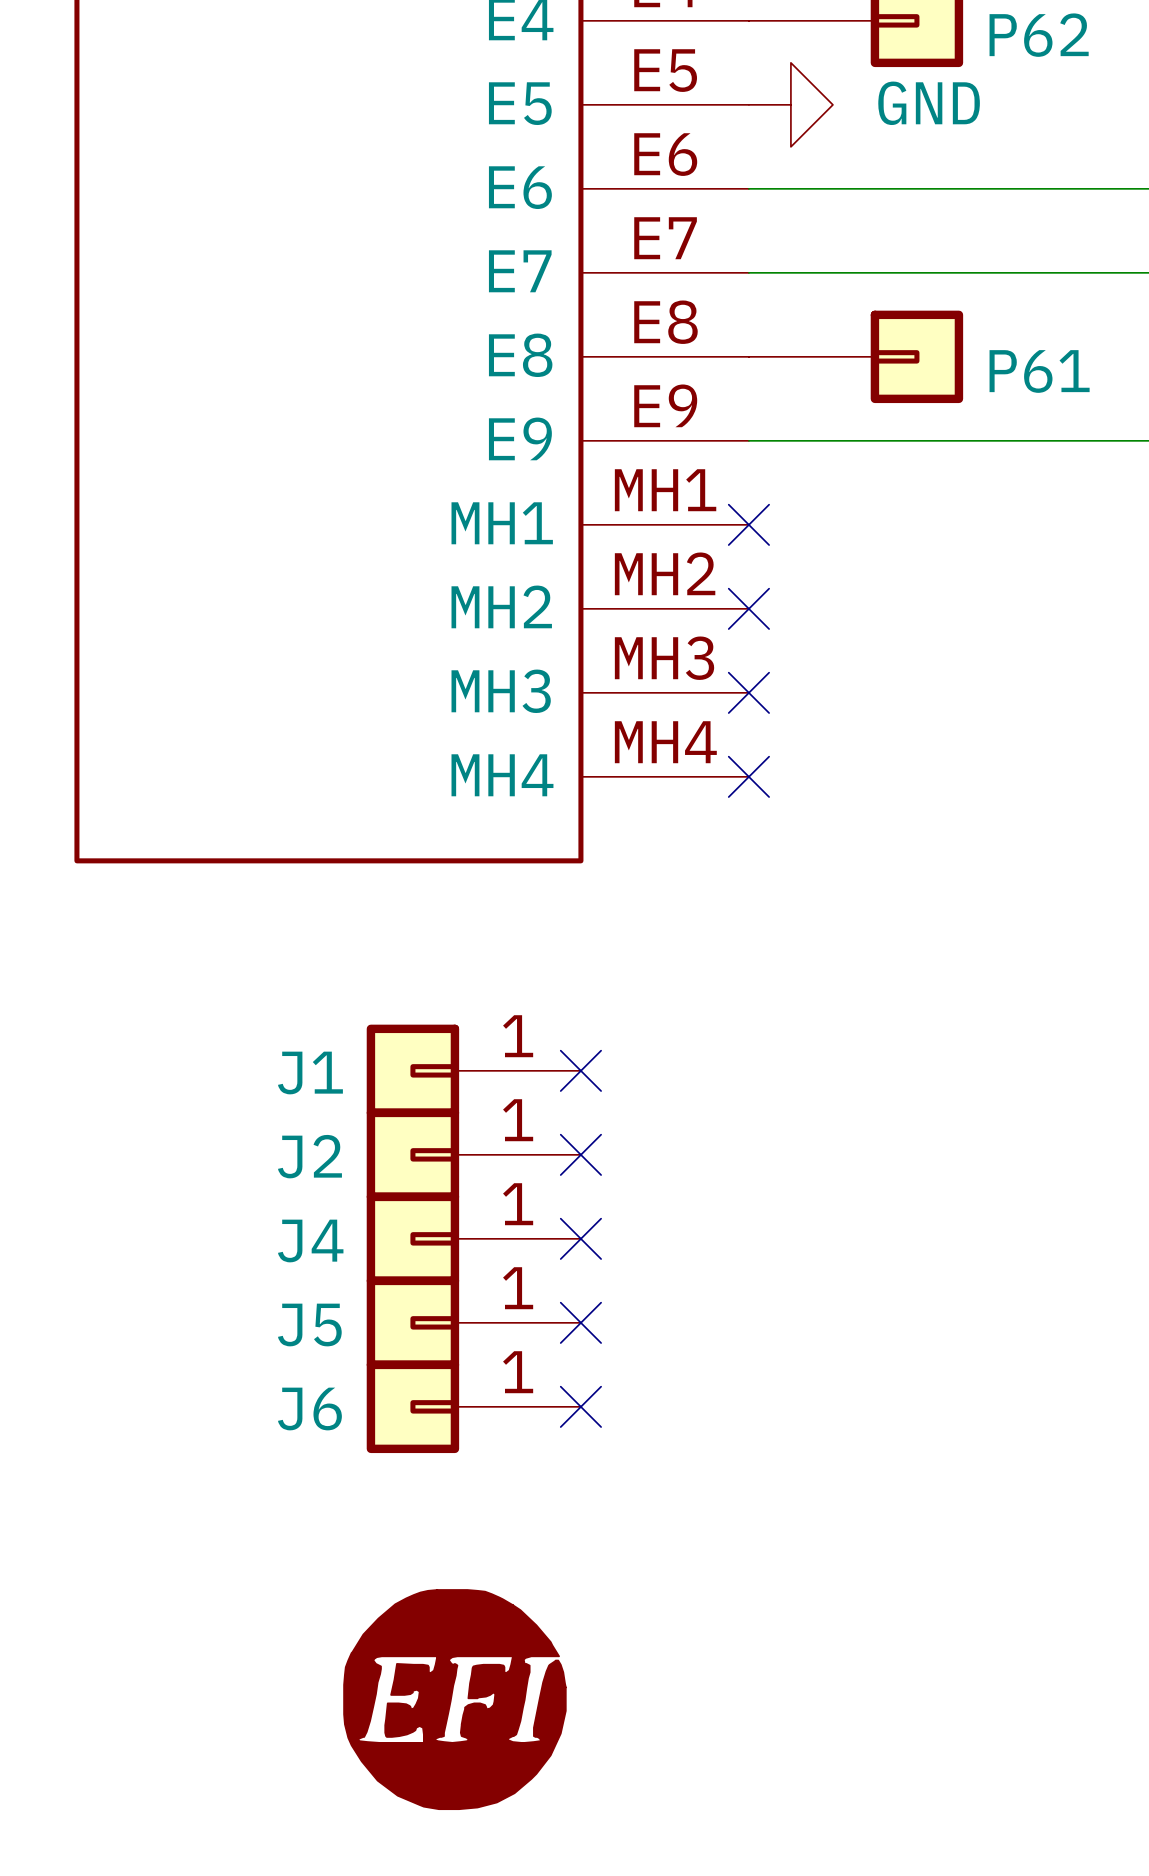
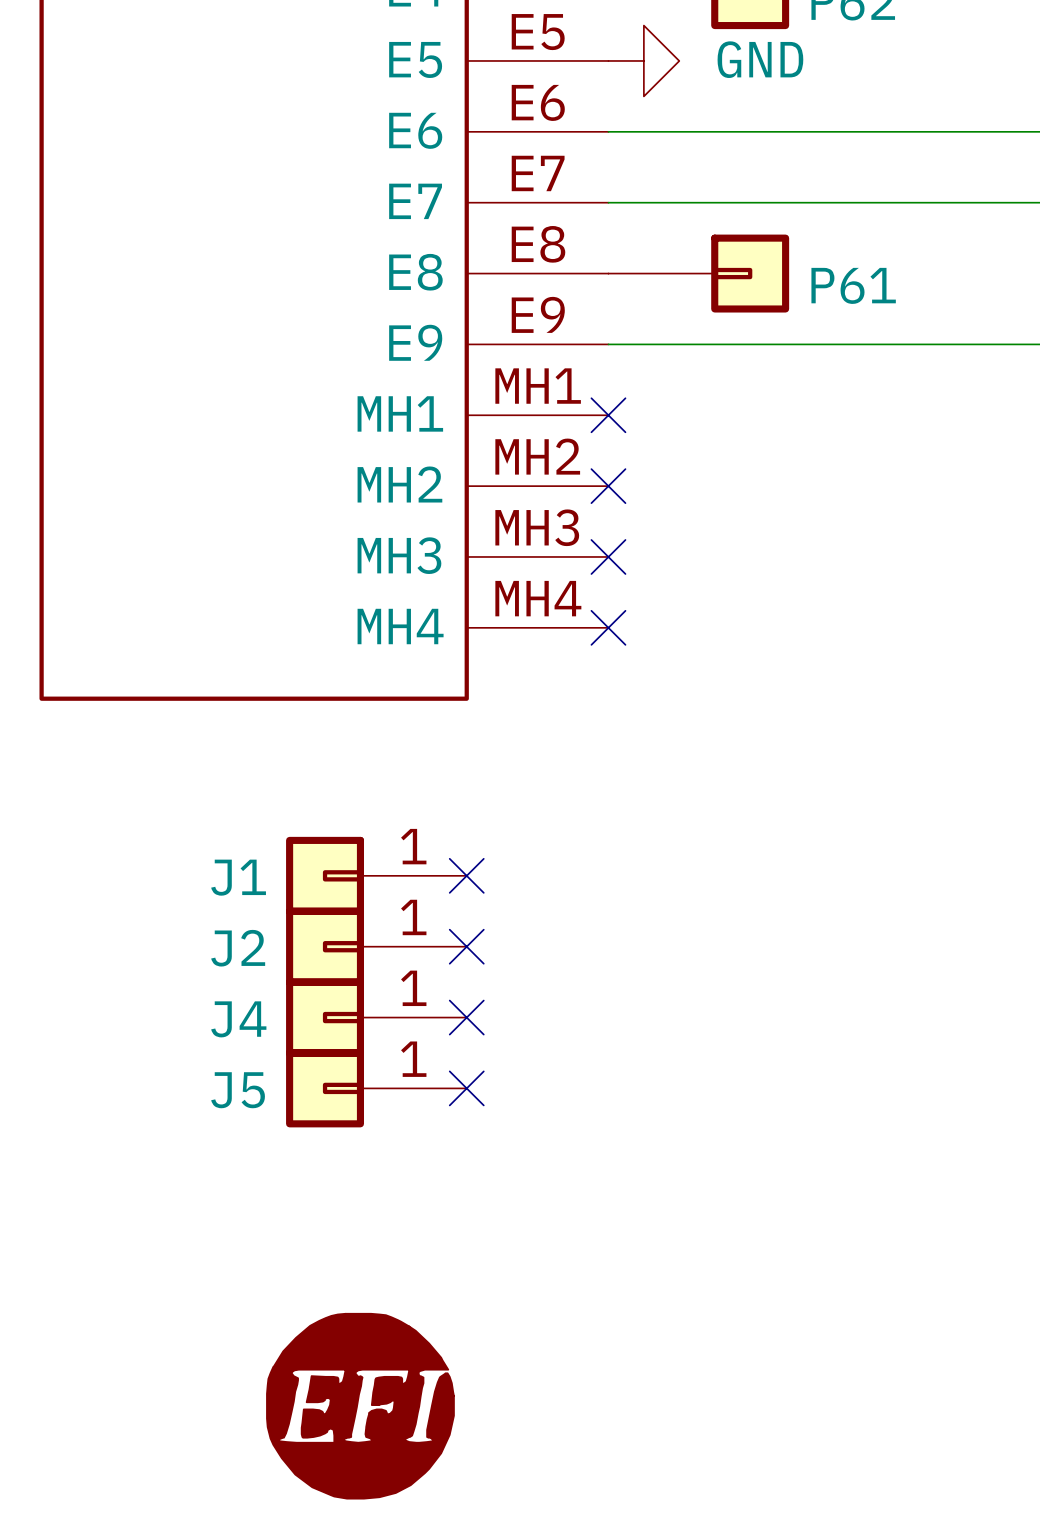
J6: (473, 1406) -> none
no-connect mark: (580, 1406) -> none

